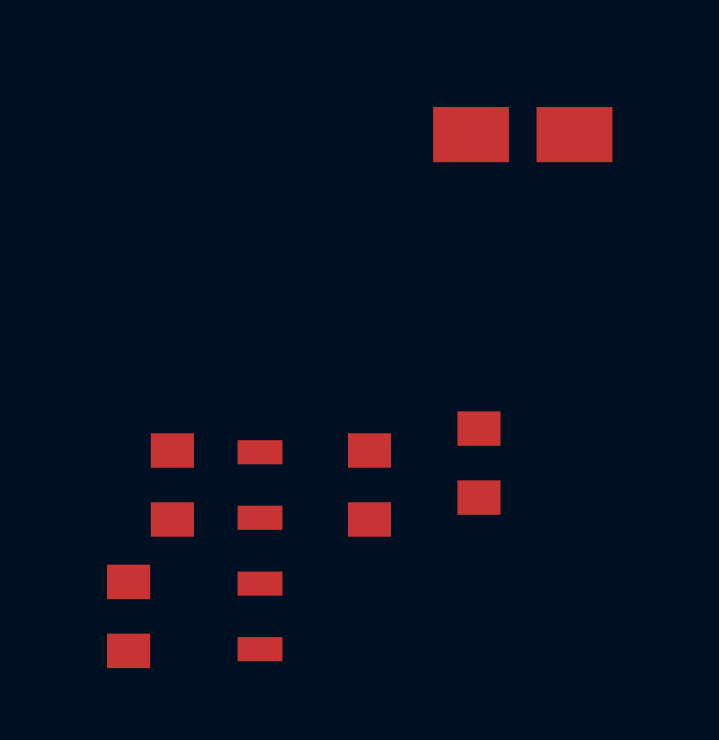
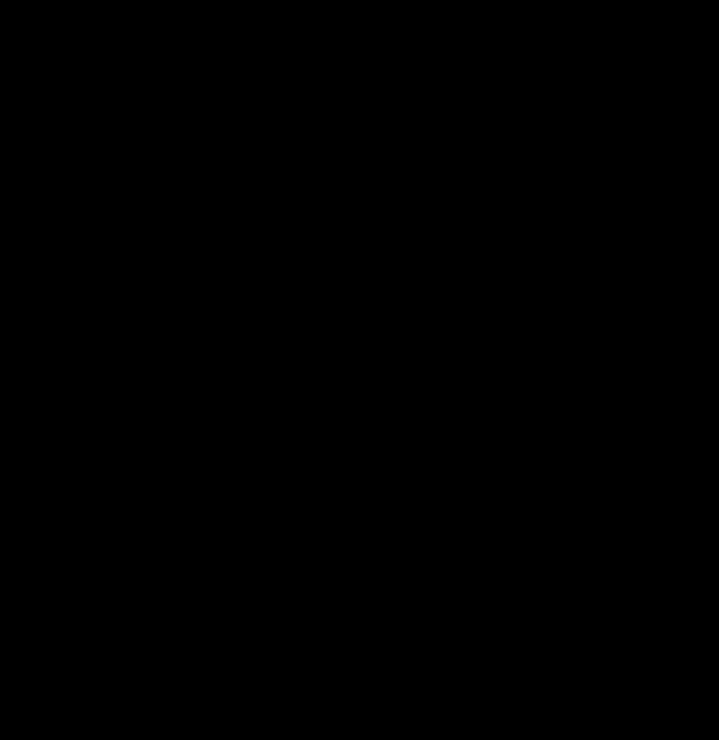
part: (522, 134) -> none
part: (478, 463) -> none
part: (172, 484) -> none
part: (259, 484) -> none
part: (369, 484) -> none
part: (128, 616) -> none
part: (259, 616) -> none

